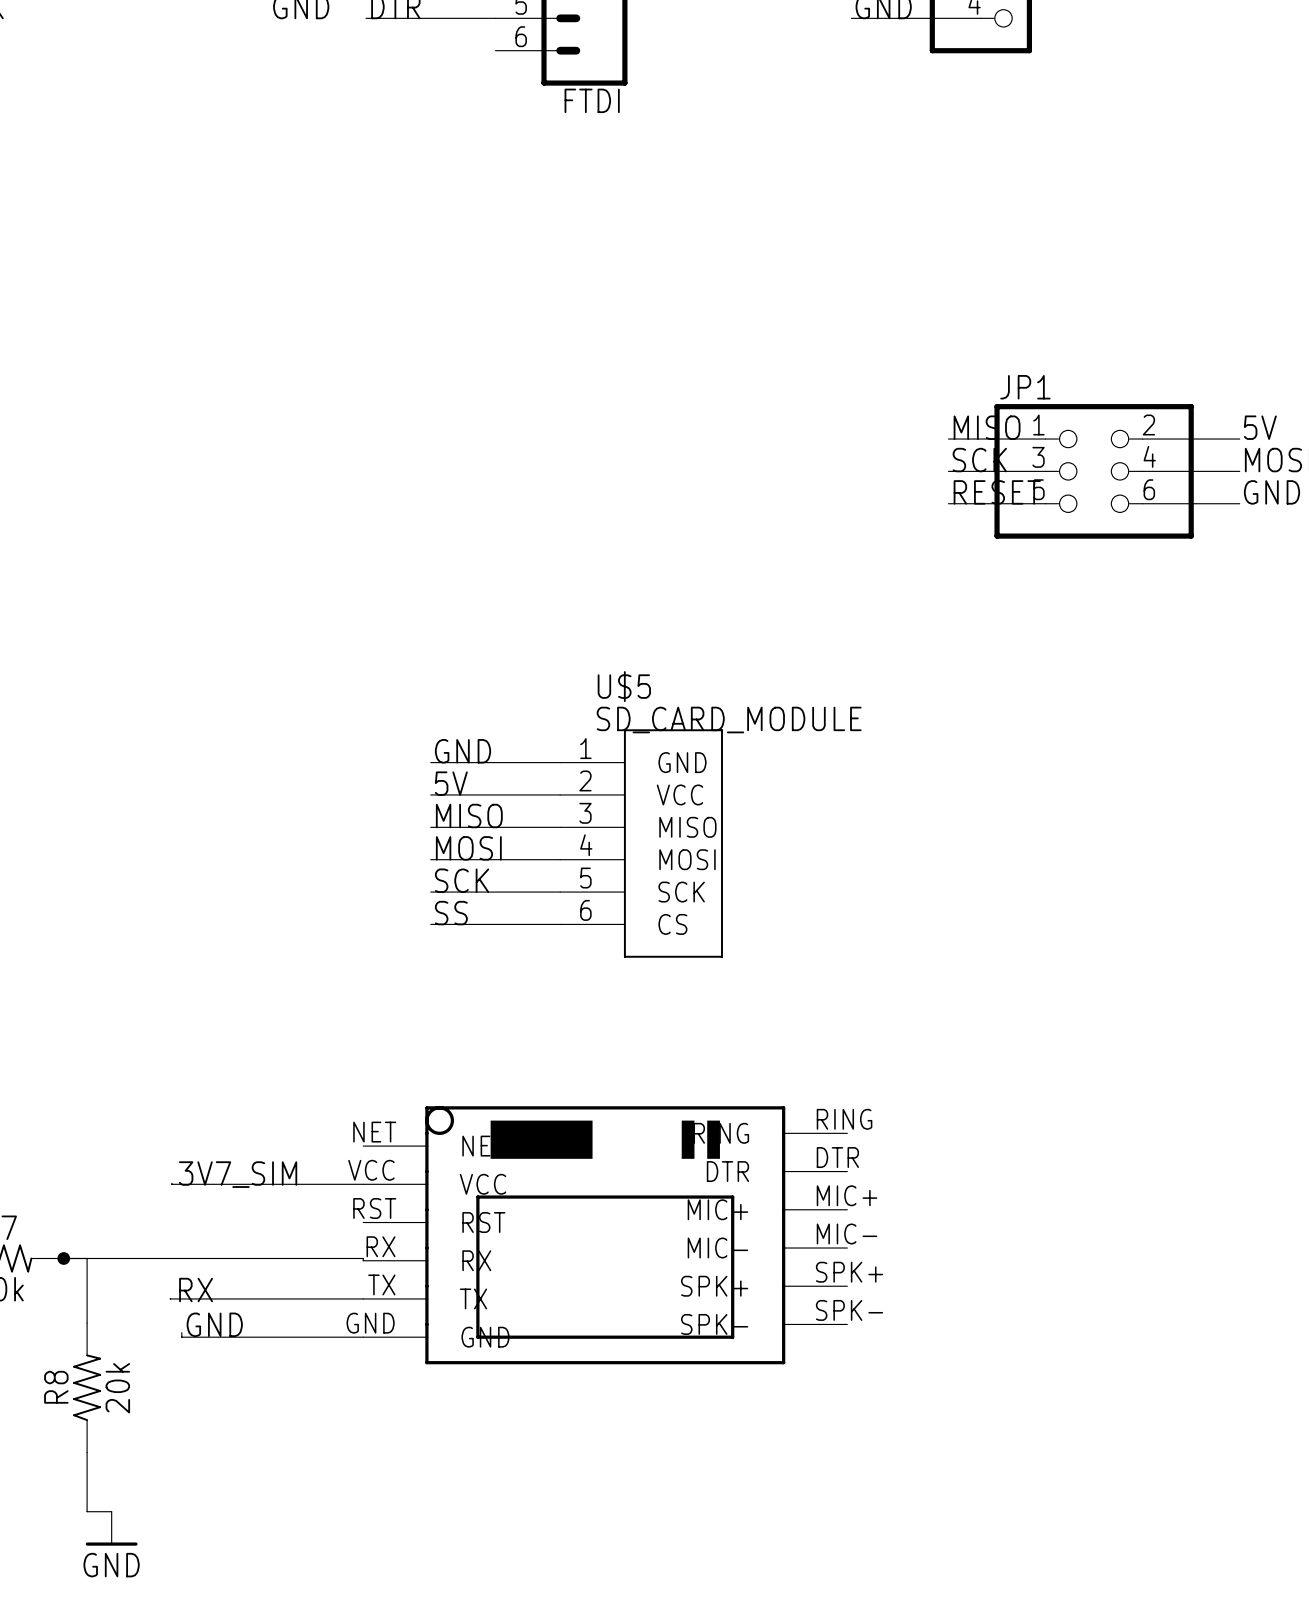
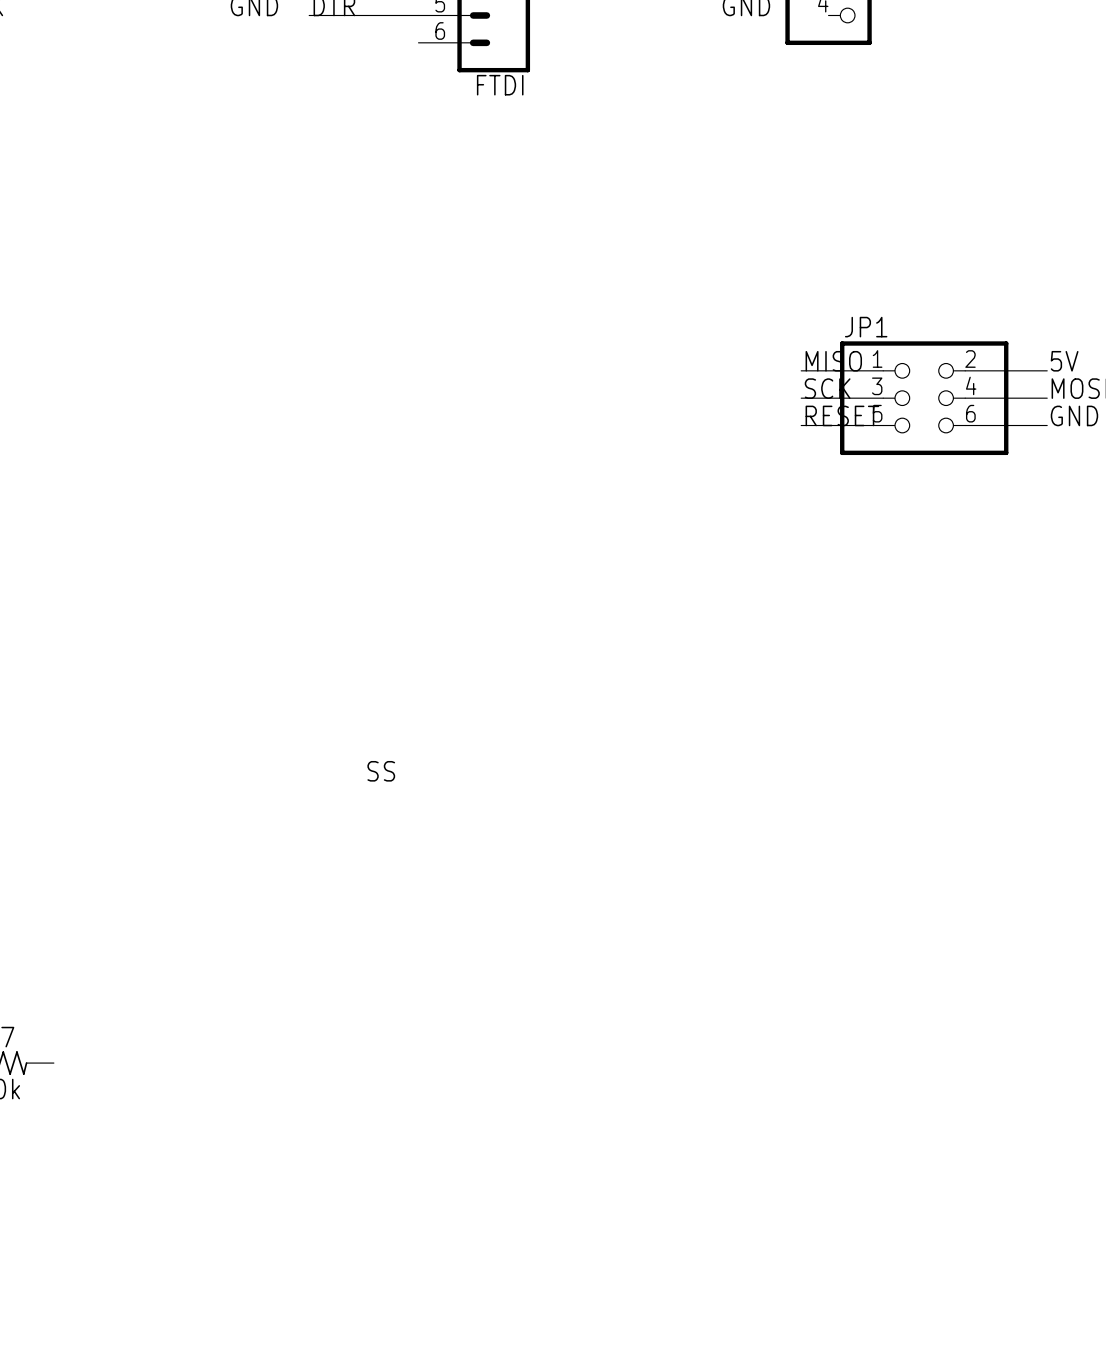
wire: (851, 18) (980, 18) -> none
label: GND (463, 751) -> none
wire: (430, 762) (560, 762) -> none
label: 5V (451, 783) -> none
wire: (430, 794) (560, 794) -> none
label: MISO (469, 816) -> none
wire: (430, 827) (560, 827) -> none
U$5: SD_CARD_MODULE (641, 843) -> none
label: MOSI (468, 848) -> none
wire: (430, 859) (560, 859) -> none
label: SCK (462, 880) -> none
wire: (430, 892) (560, 892) -> none
wire: (430, 924) (560, 924) -> none
label: 3V7_SIM (238, 1174) -> none
wire: (171, 1183) (363, 1184) -> none
part: (605, 1235) -> none
wire: (63, 1258) (363, 1258) (363, 1260) -> none
junction: (63, 1258) -> none
wire: (87, 1258) (87, 1323) -> none
label: RX (196, 1290) -> none
wire: (170, 1298) (363, 1298) -> none
label: GND (214, 1324) -> none
wire: (181, 1332) (181, 1337) (363, 1337) -> none
R8: 20k (87, 1387) -> none
wire: (87, 1452) (87, 1511) (111, 1511) -> none
power symbol: GND (111, 1528) -> none

